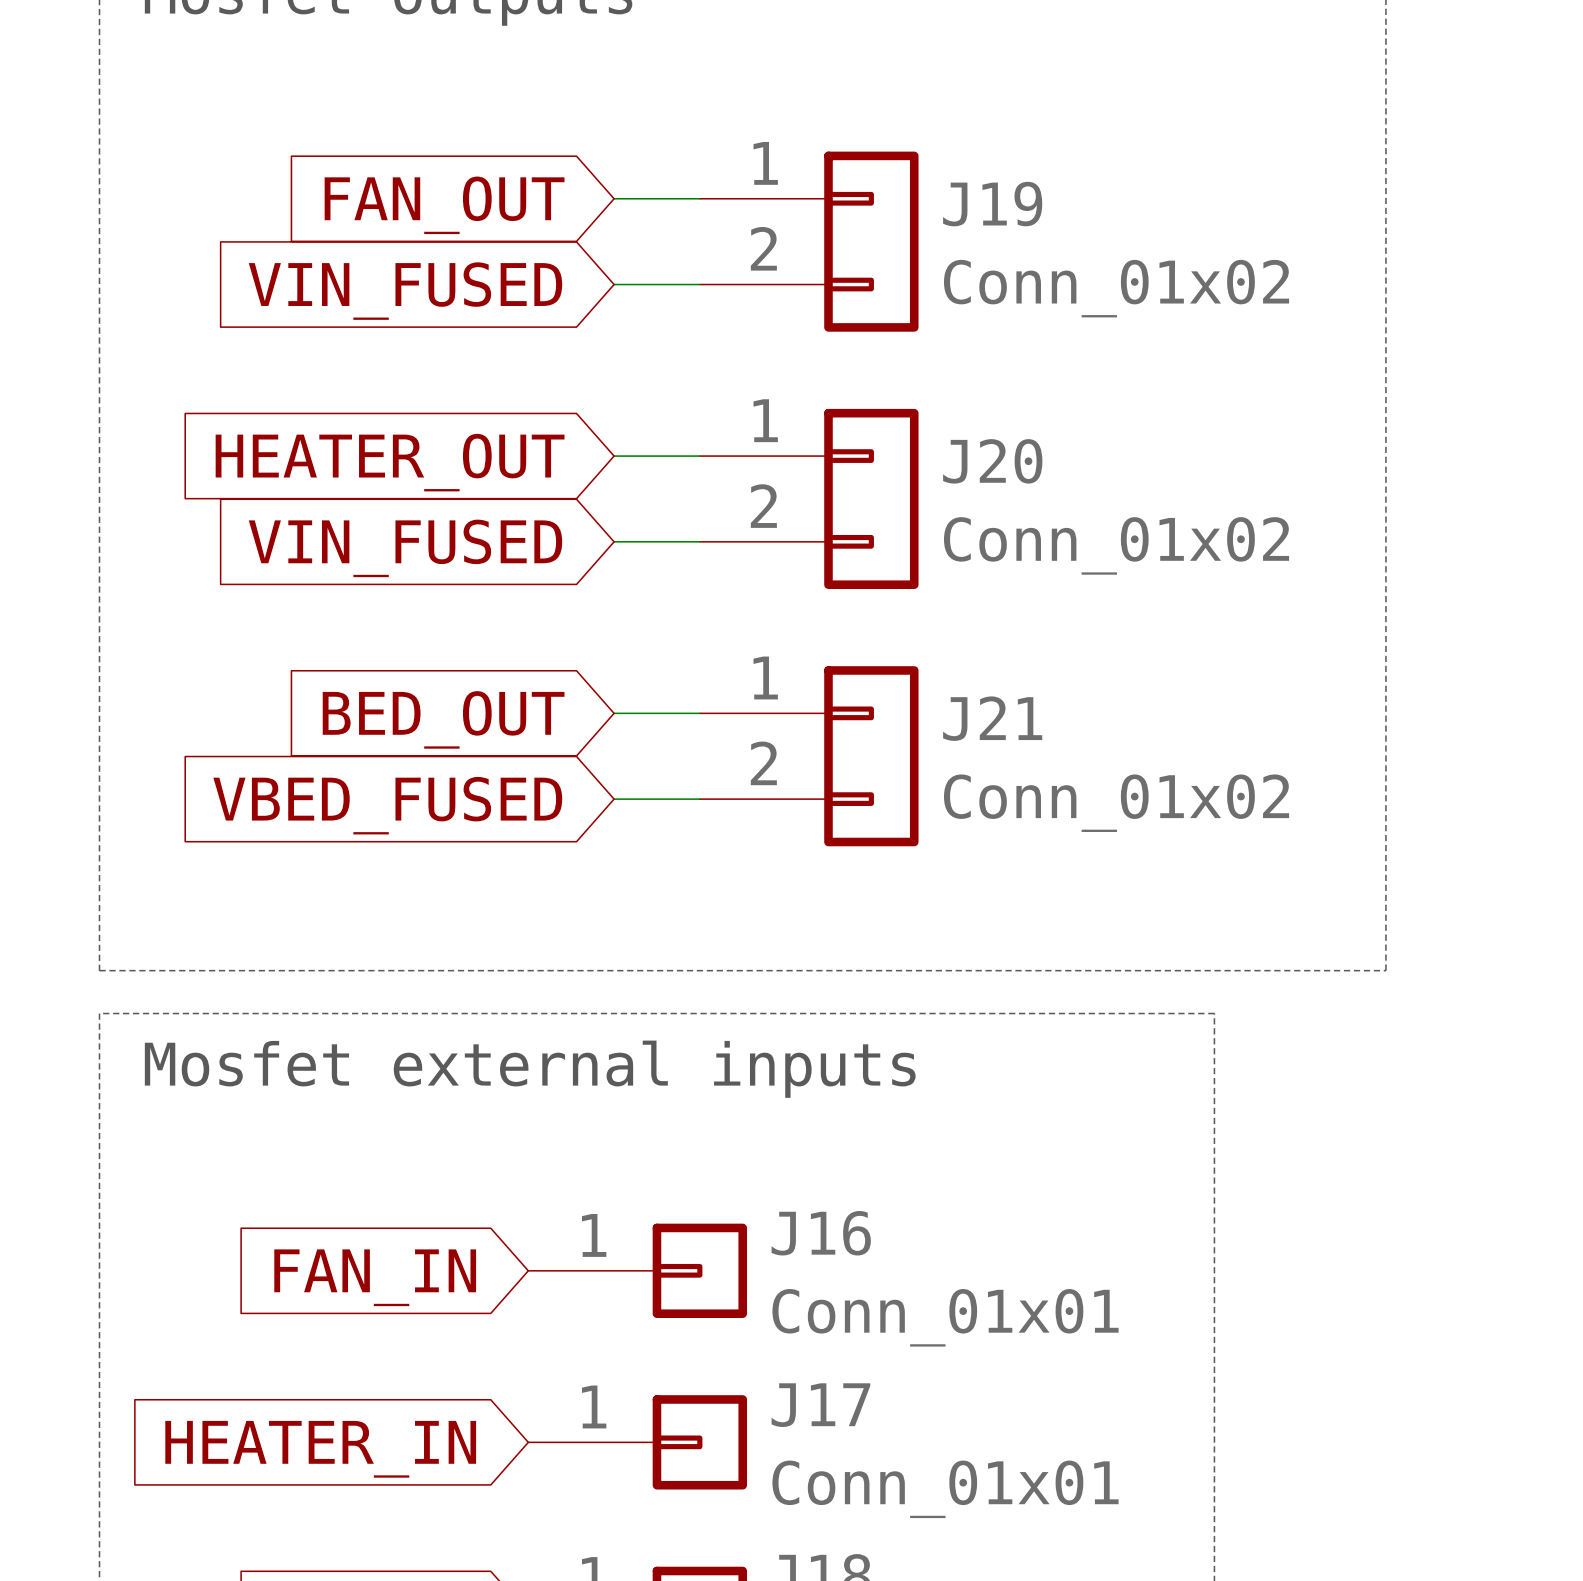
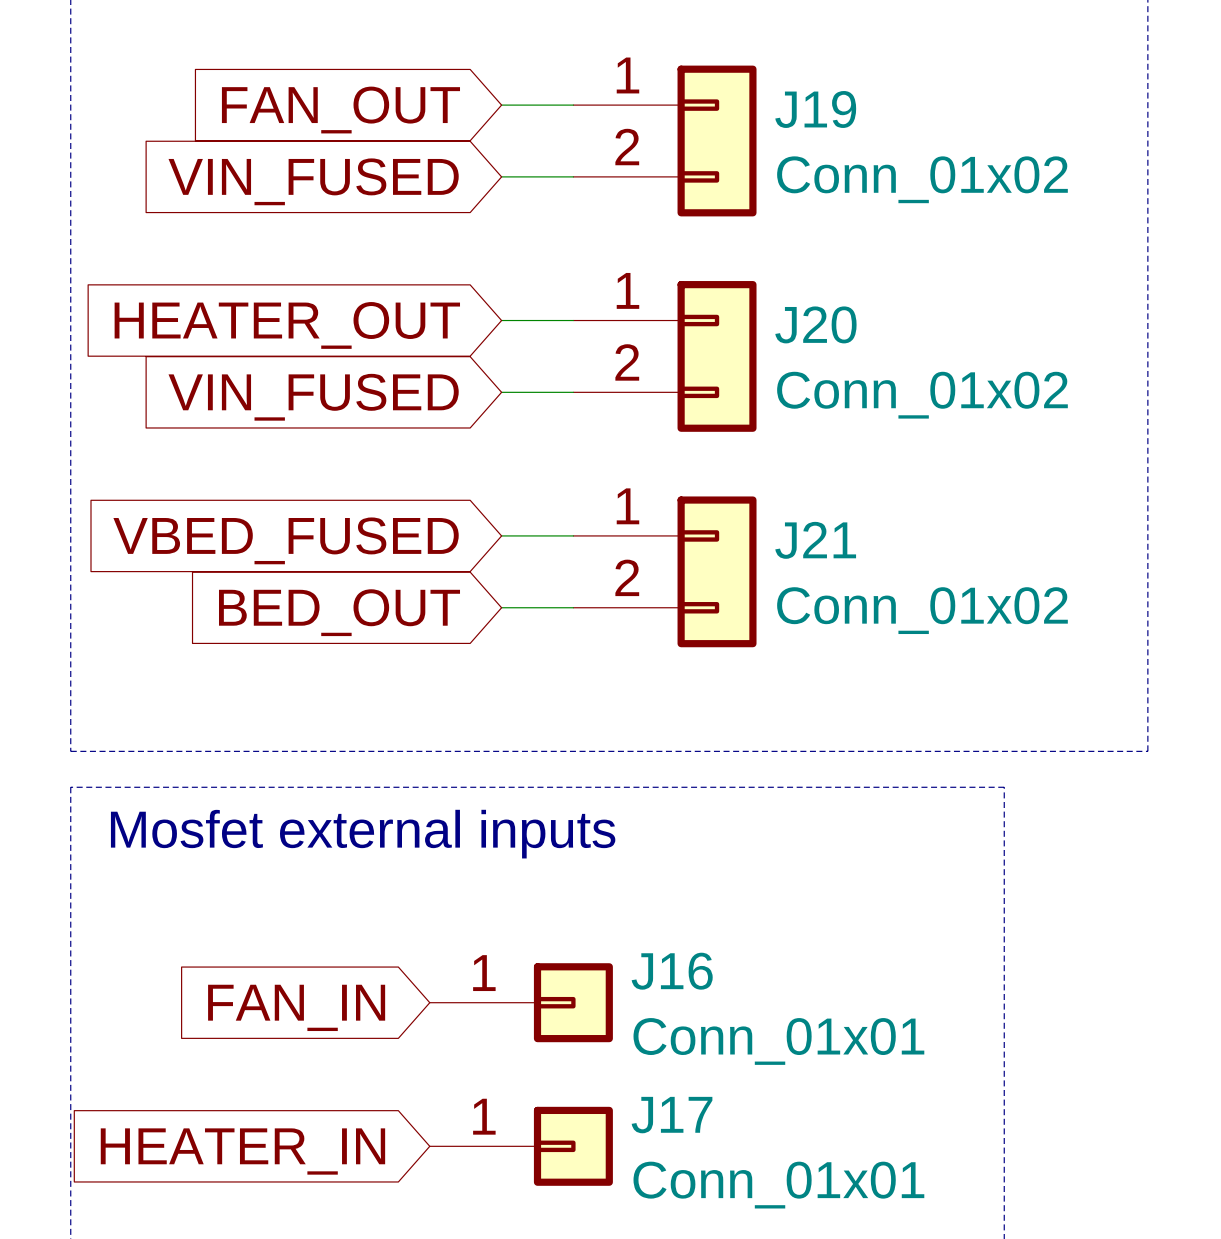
global label: BED_OUT (443, 719) -> VBED_FUSED (286, 540)
global label: VBED_FUSED (387, 805) -> BED_OUT (339, 612)

